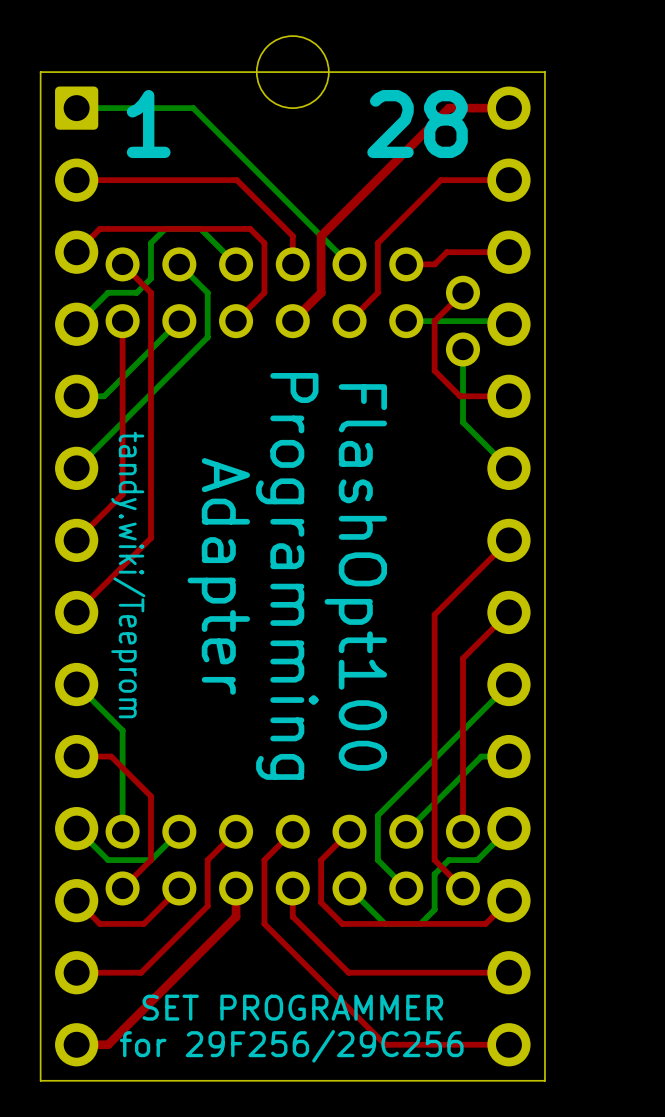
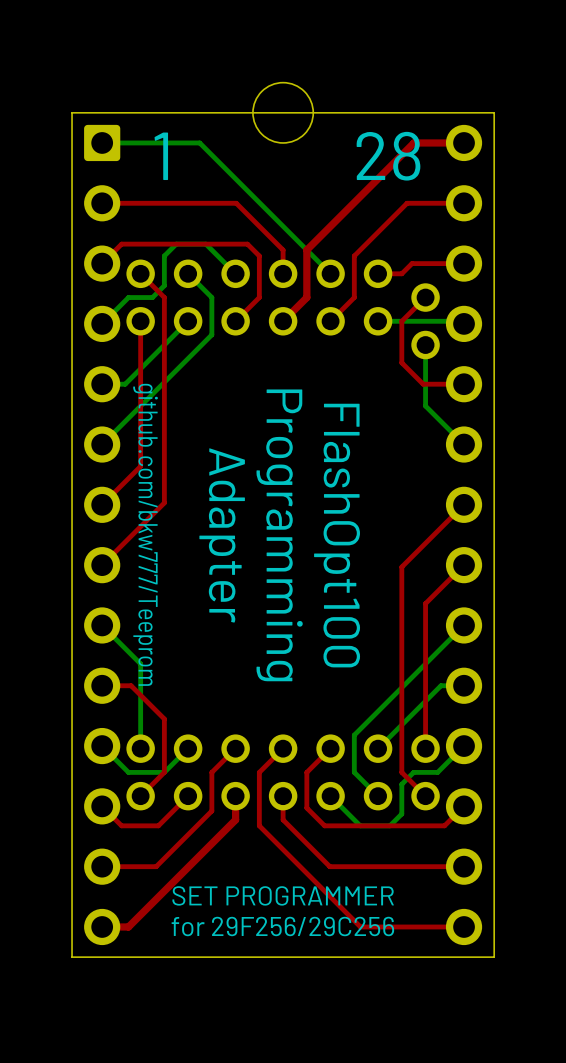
text: tandy.wiki/Teeprom (128, 575) -> github.com/bkw777/Teeprom (145, 534)

